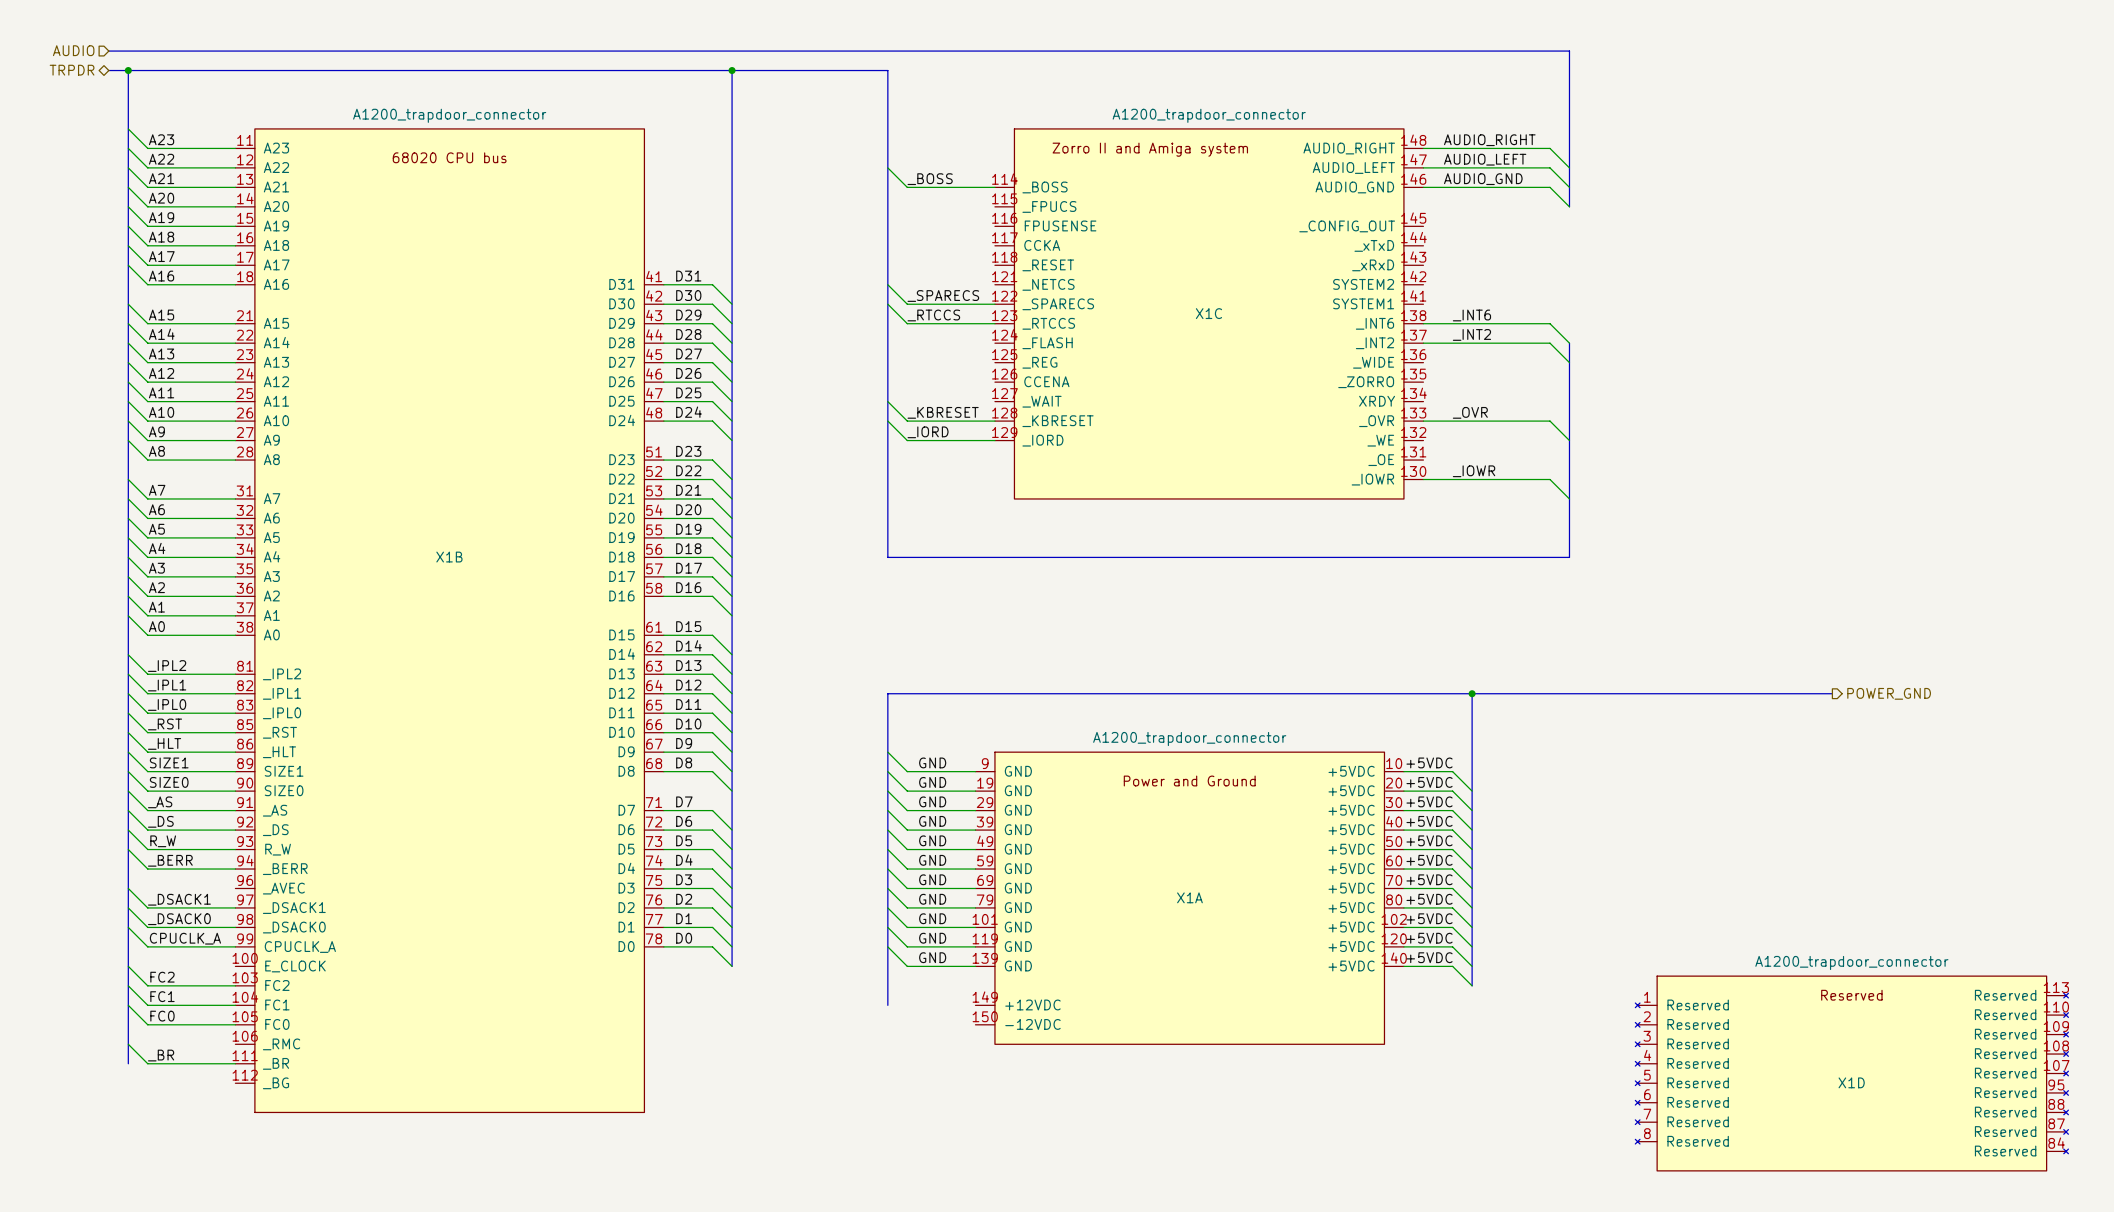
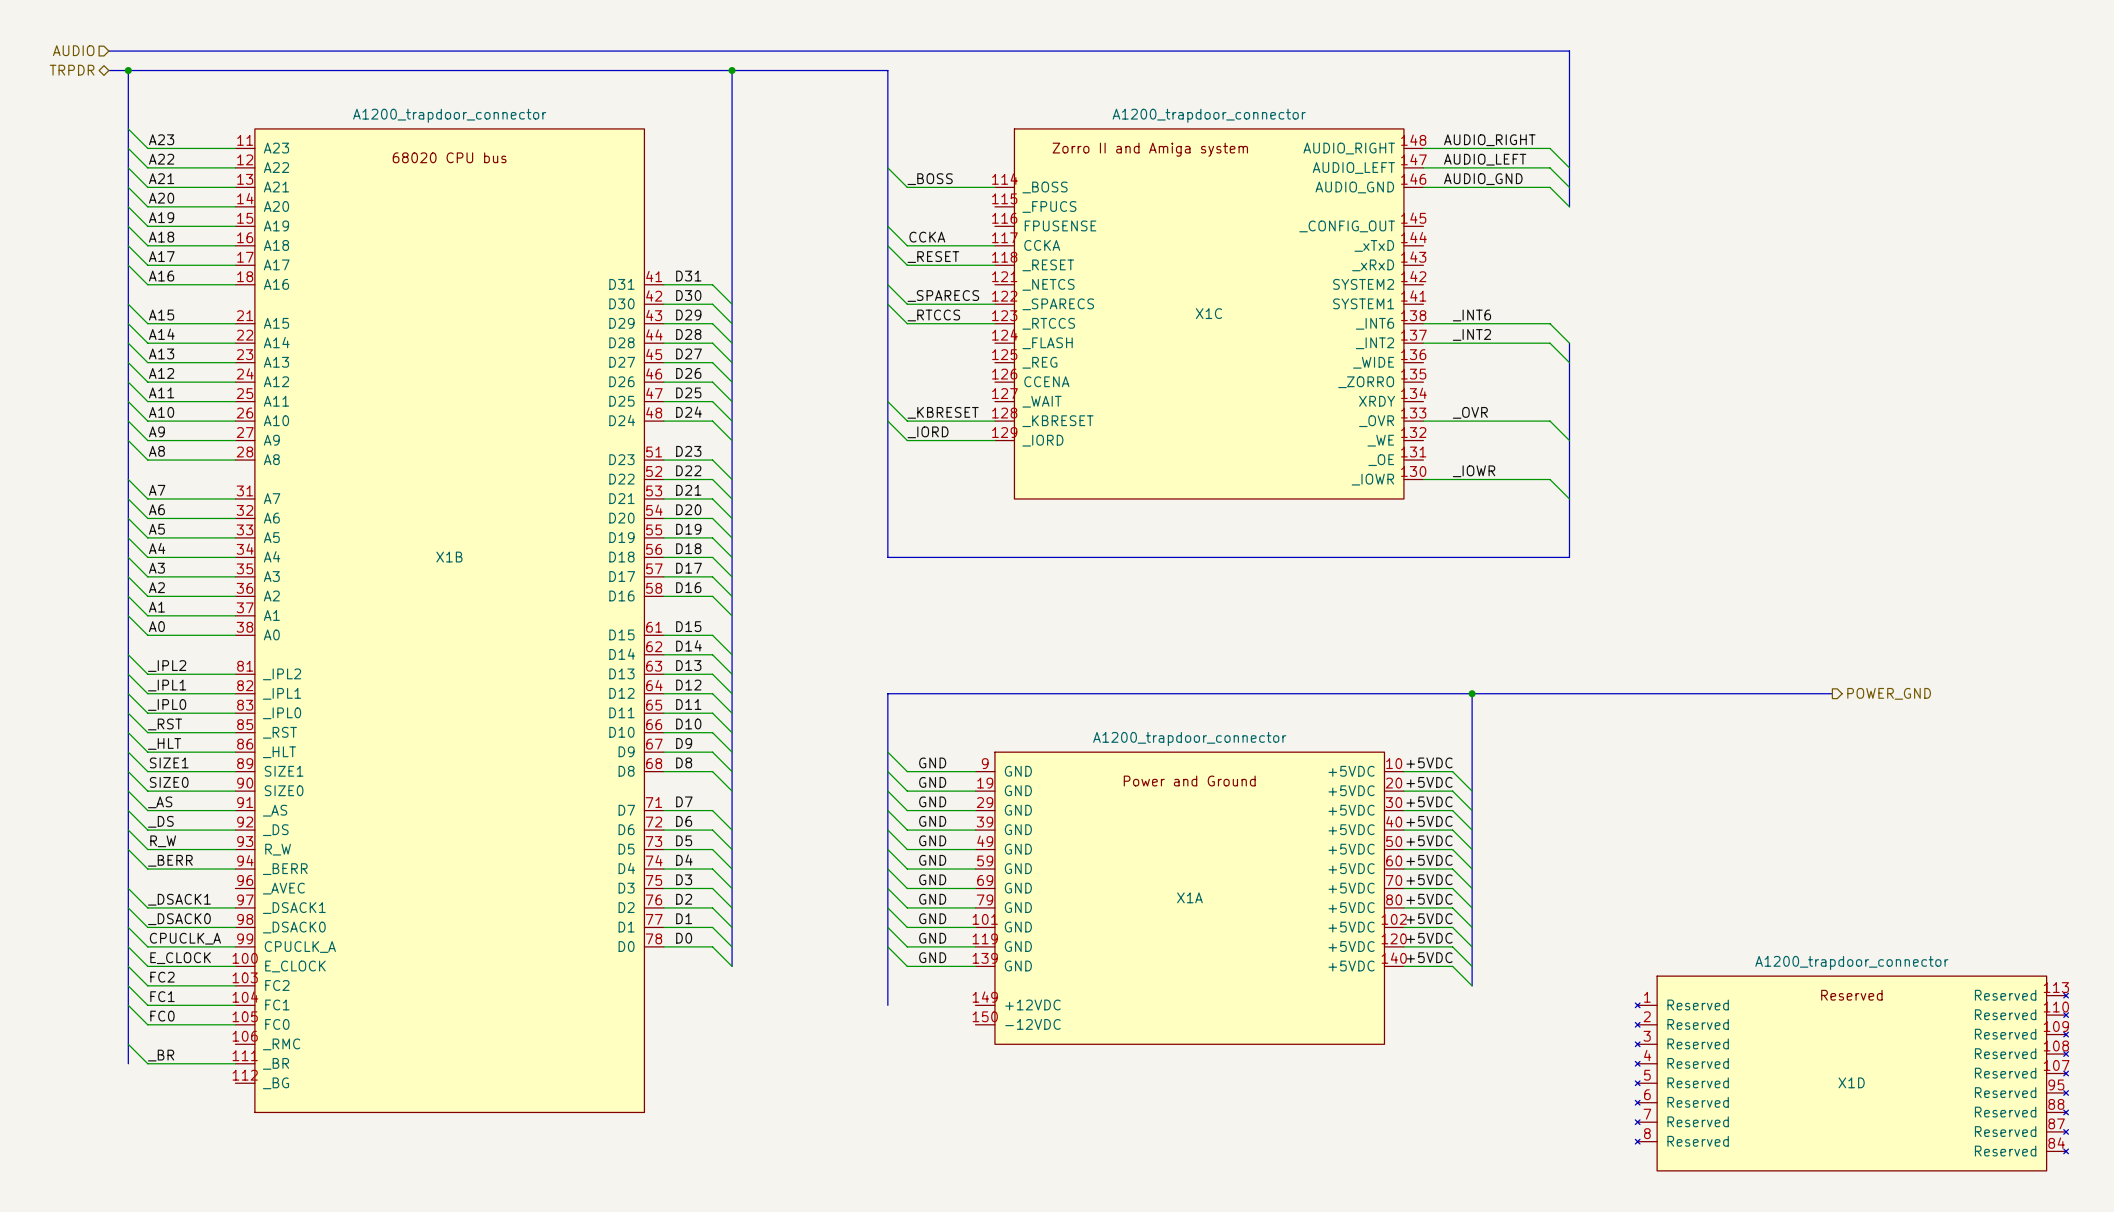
wire: none -> (887, 226) (907, 245) (994, 245)
label: none -> CCKA (927, 237)
wire: none -> (887, 245) (907, 265) (994, 265)
label: none -> _RESET (933, 257)
wire: none -> (128, 946) (147, 966) (235, 966)
label: none -> E_CLOCK (180, 958)

